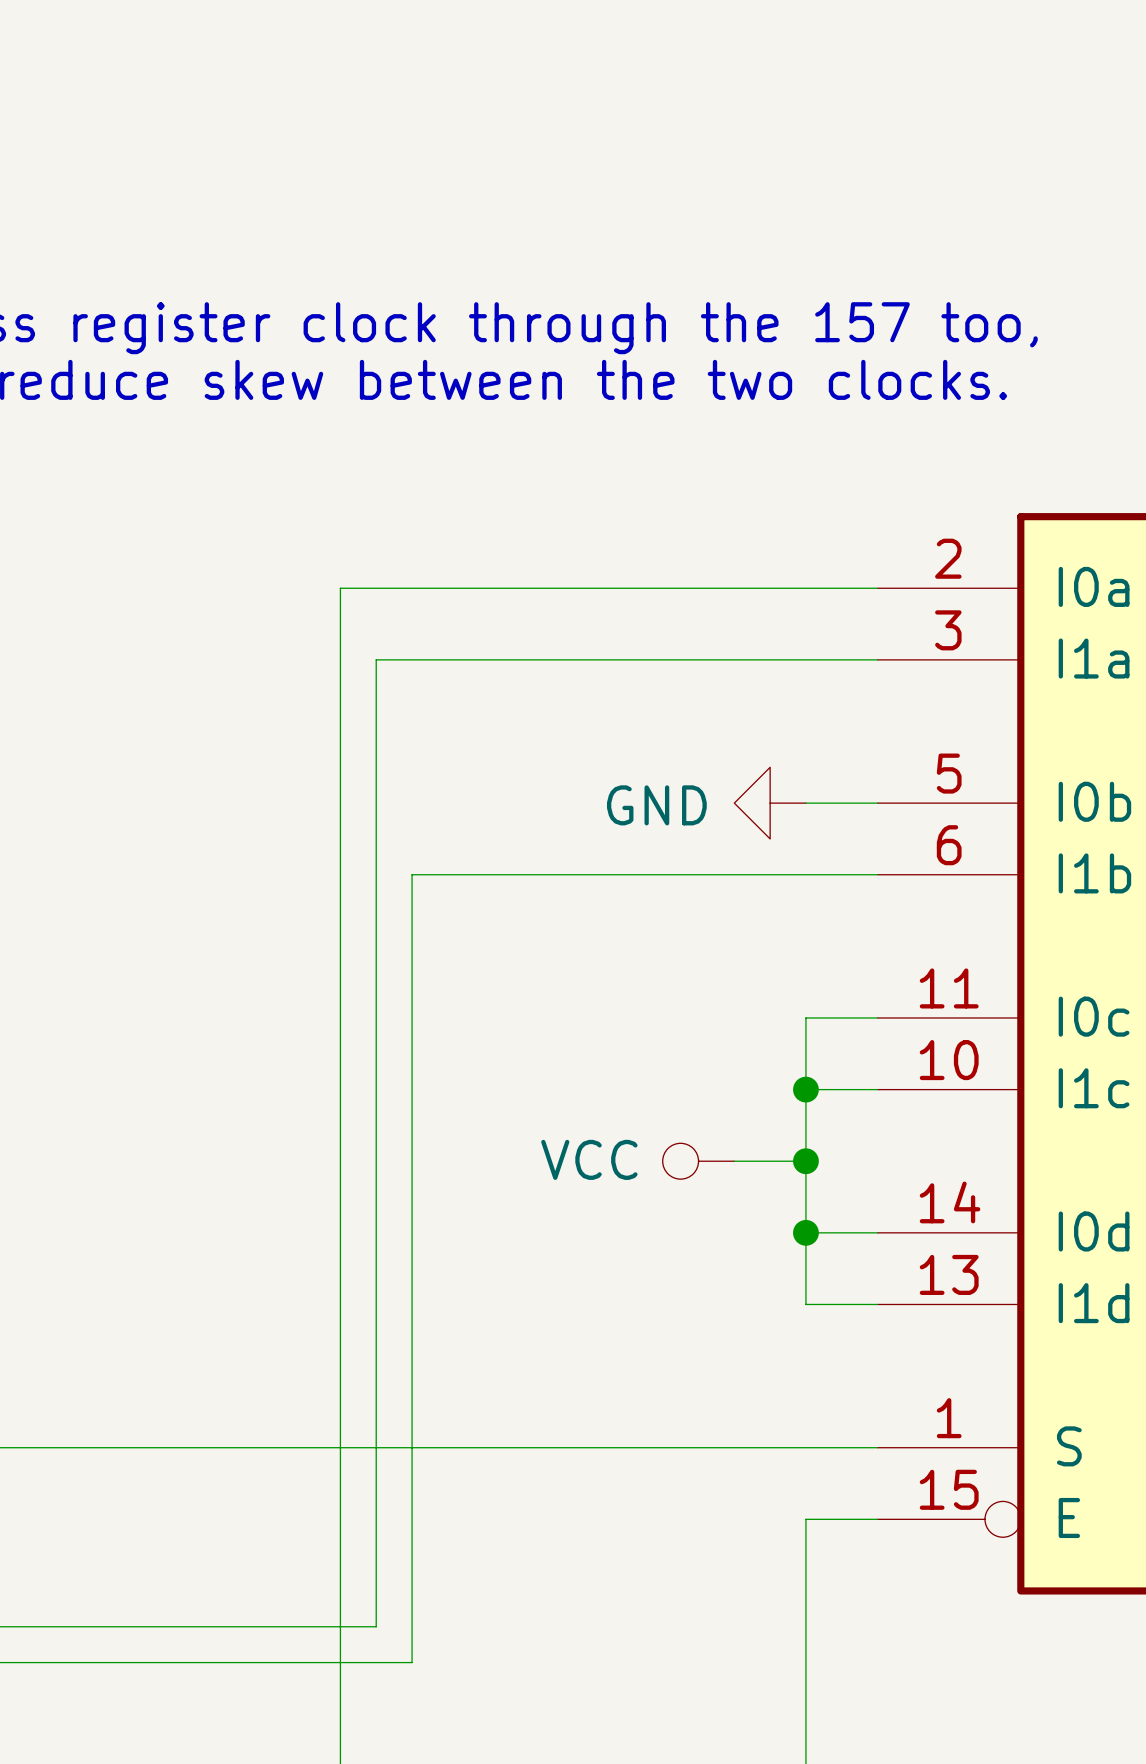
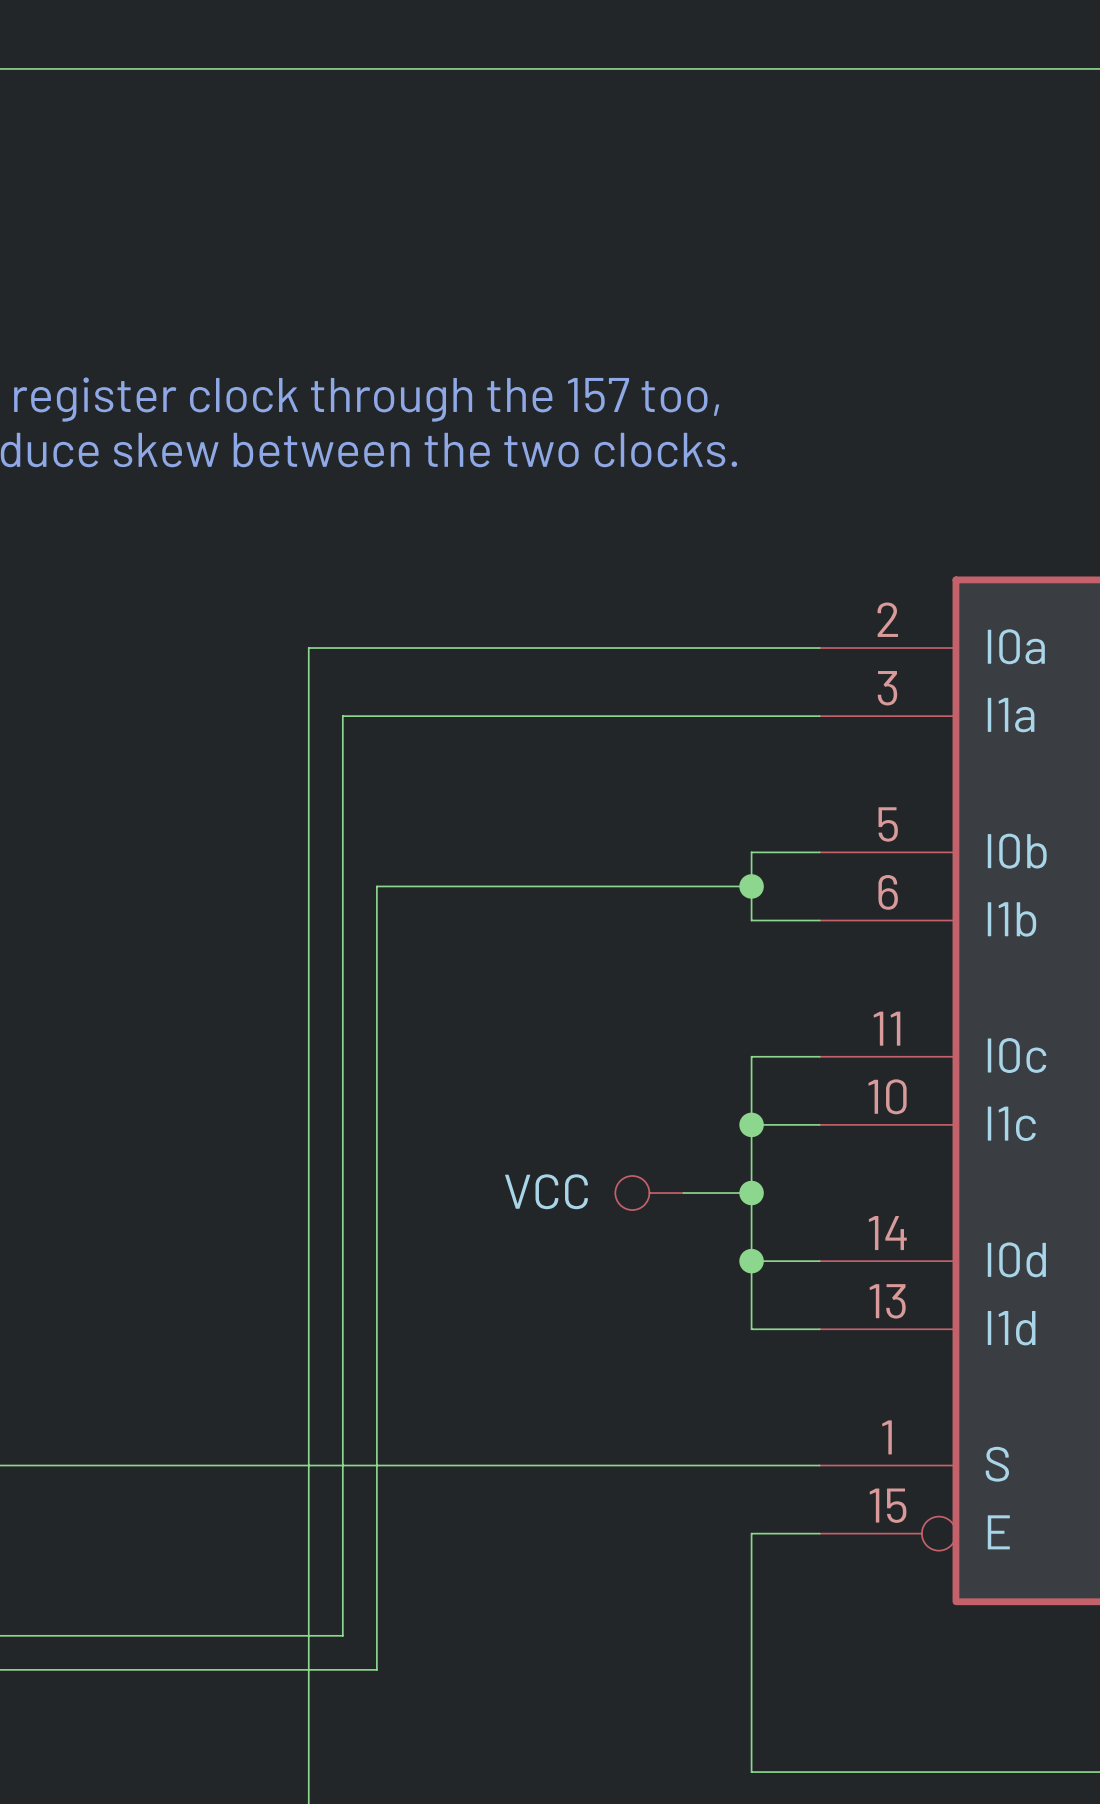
power symbol: GND (770, 803) -> none
wire: none -> (751, 852) (751, 920)
junction: none -> (751, 886)
wire: (412, 874) (805, 874) -> (376, 920) (376, 886) (751, 886)

